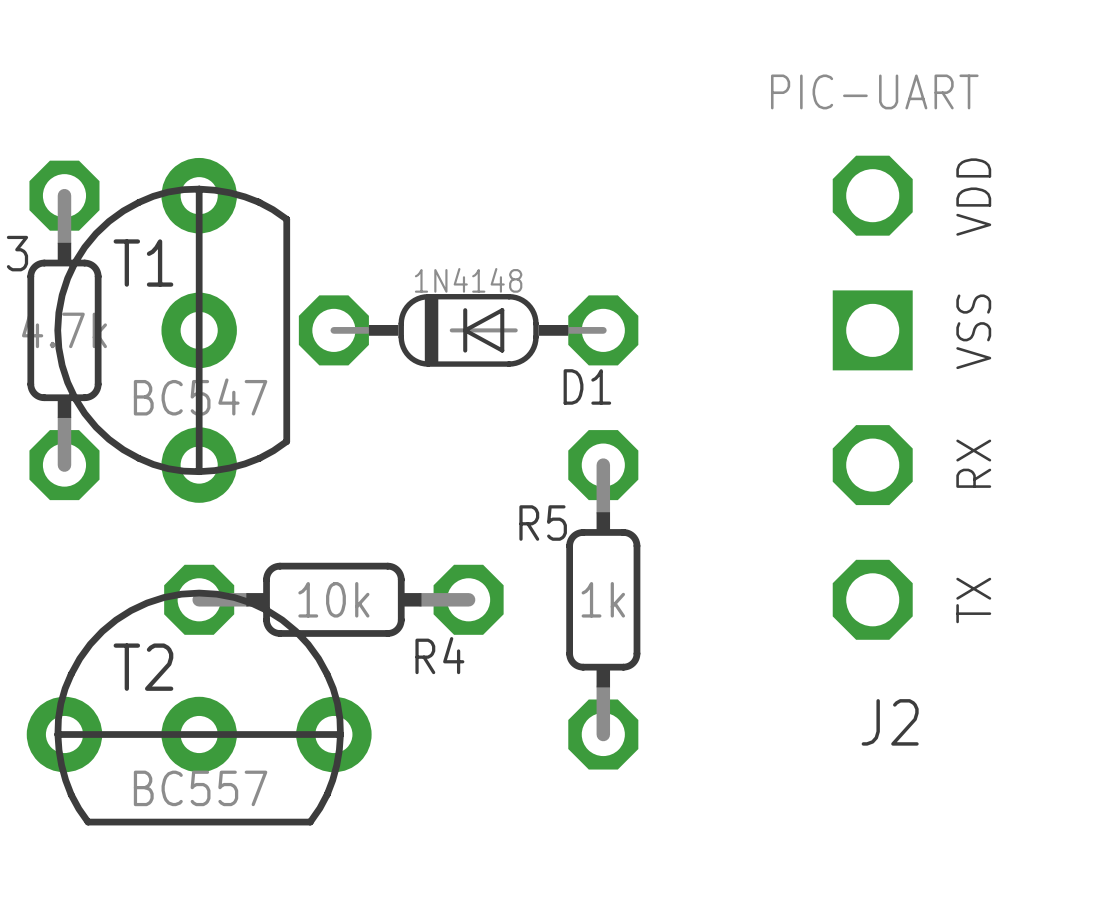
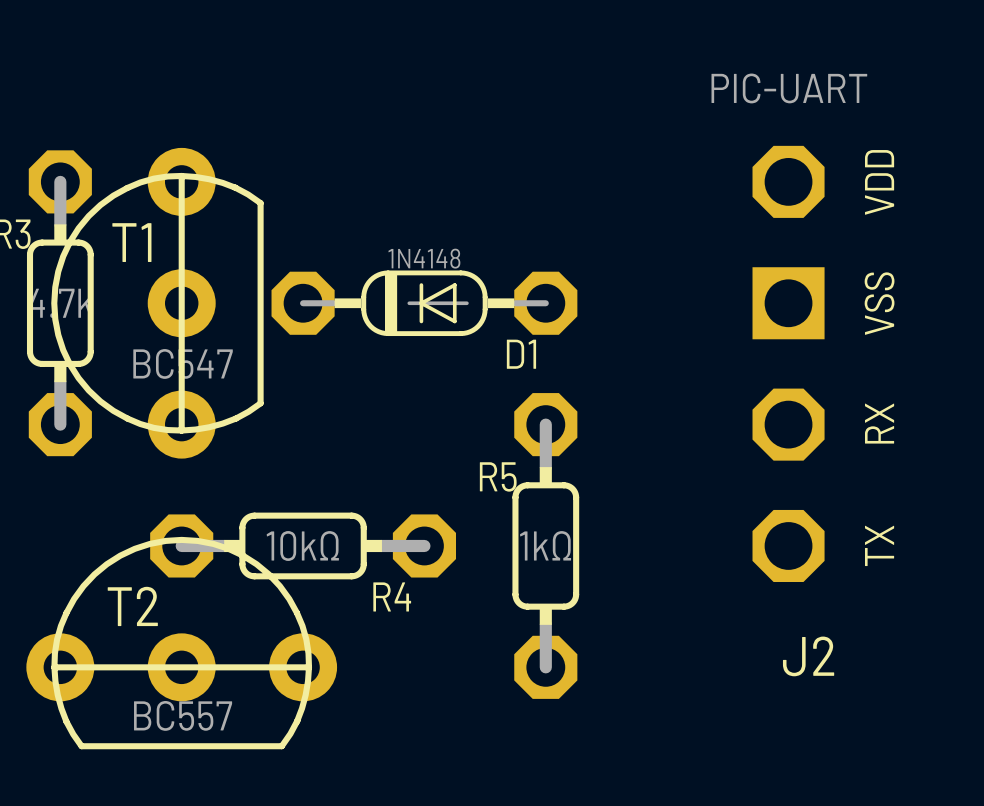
R4 value: 10k (333, 599) -> 10kΩ (302, 546)
R5 value: 1k (603, 599) -> 1kΩ (545, 545)

